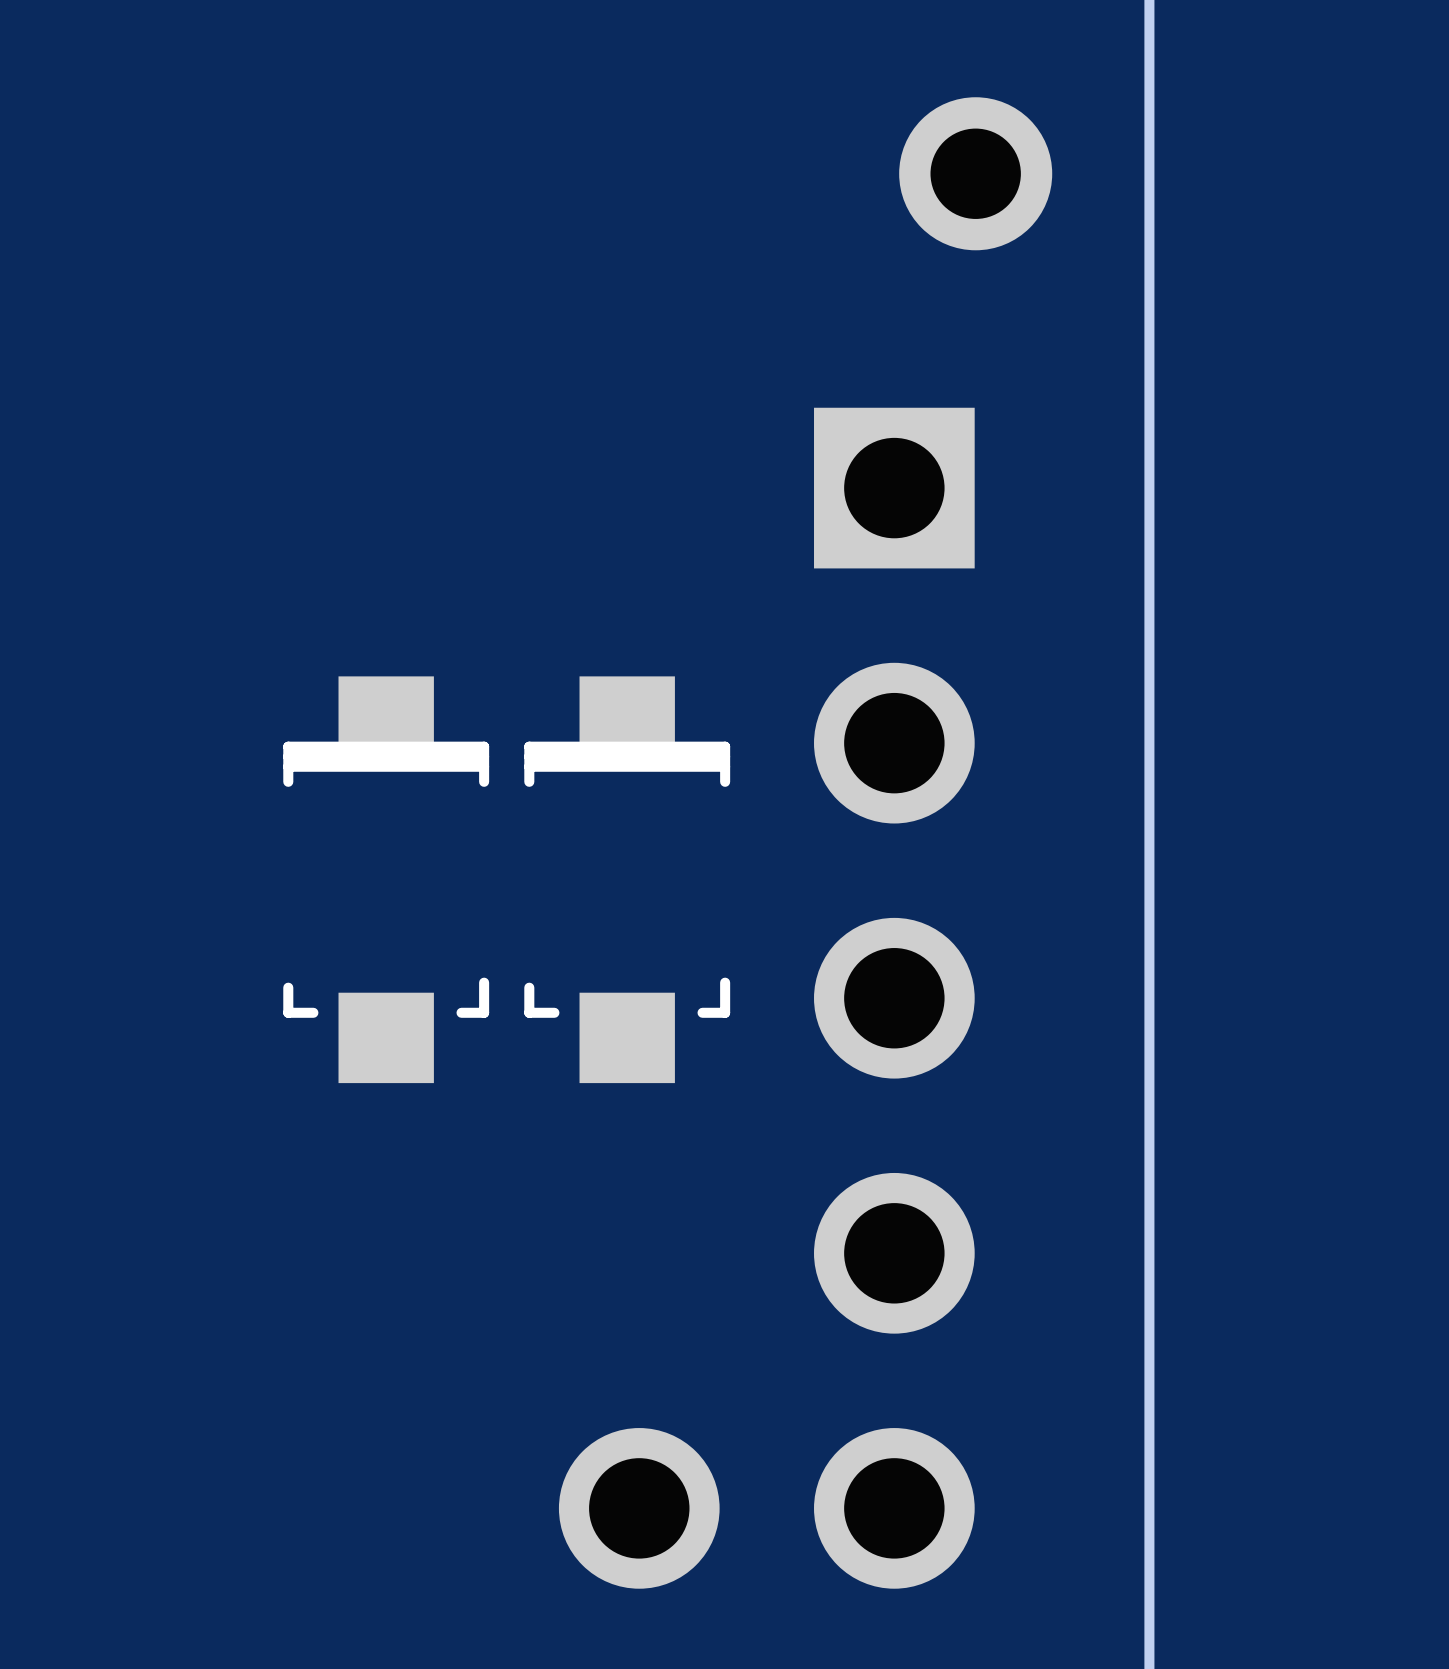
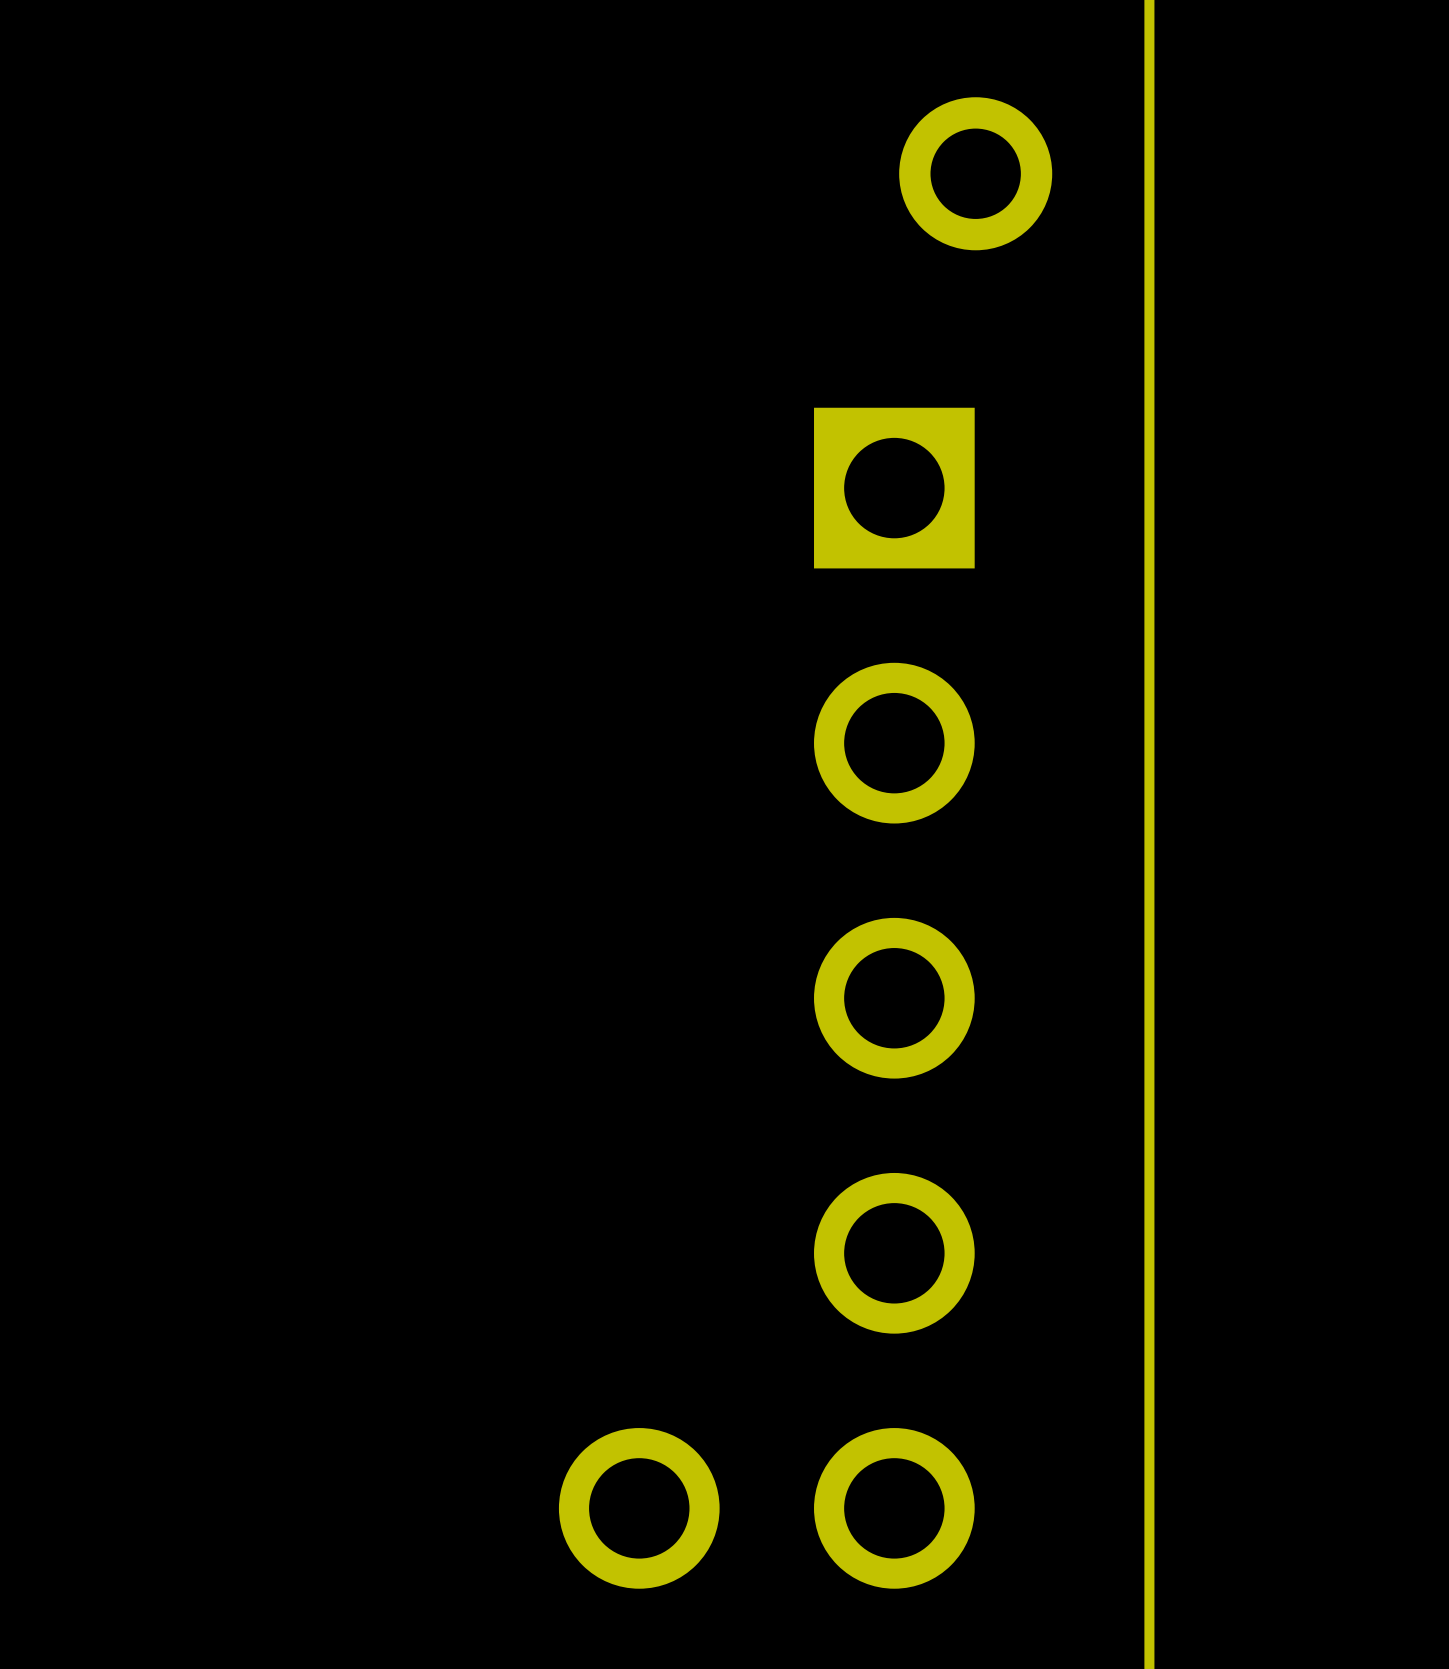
part: (386, 879) -> none
part: (627, 879) -> none

